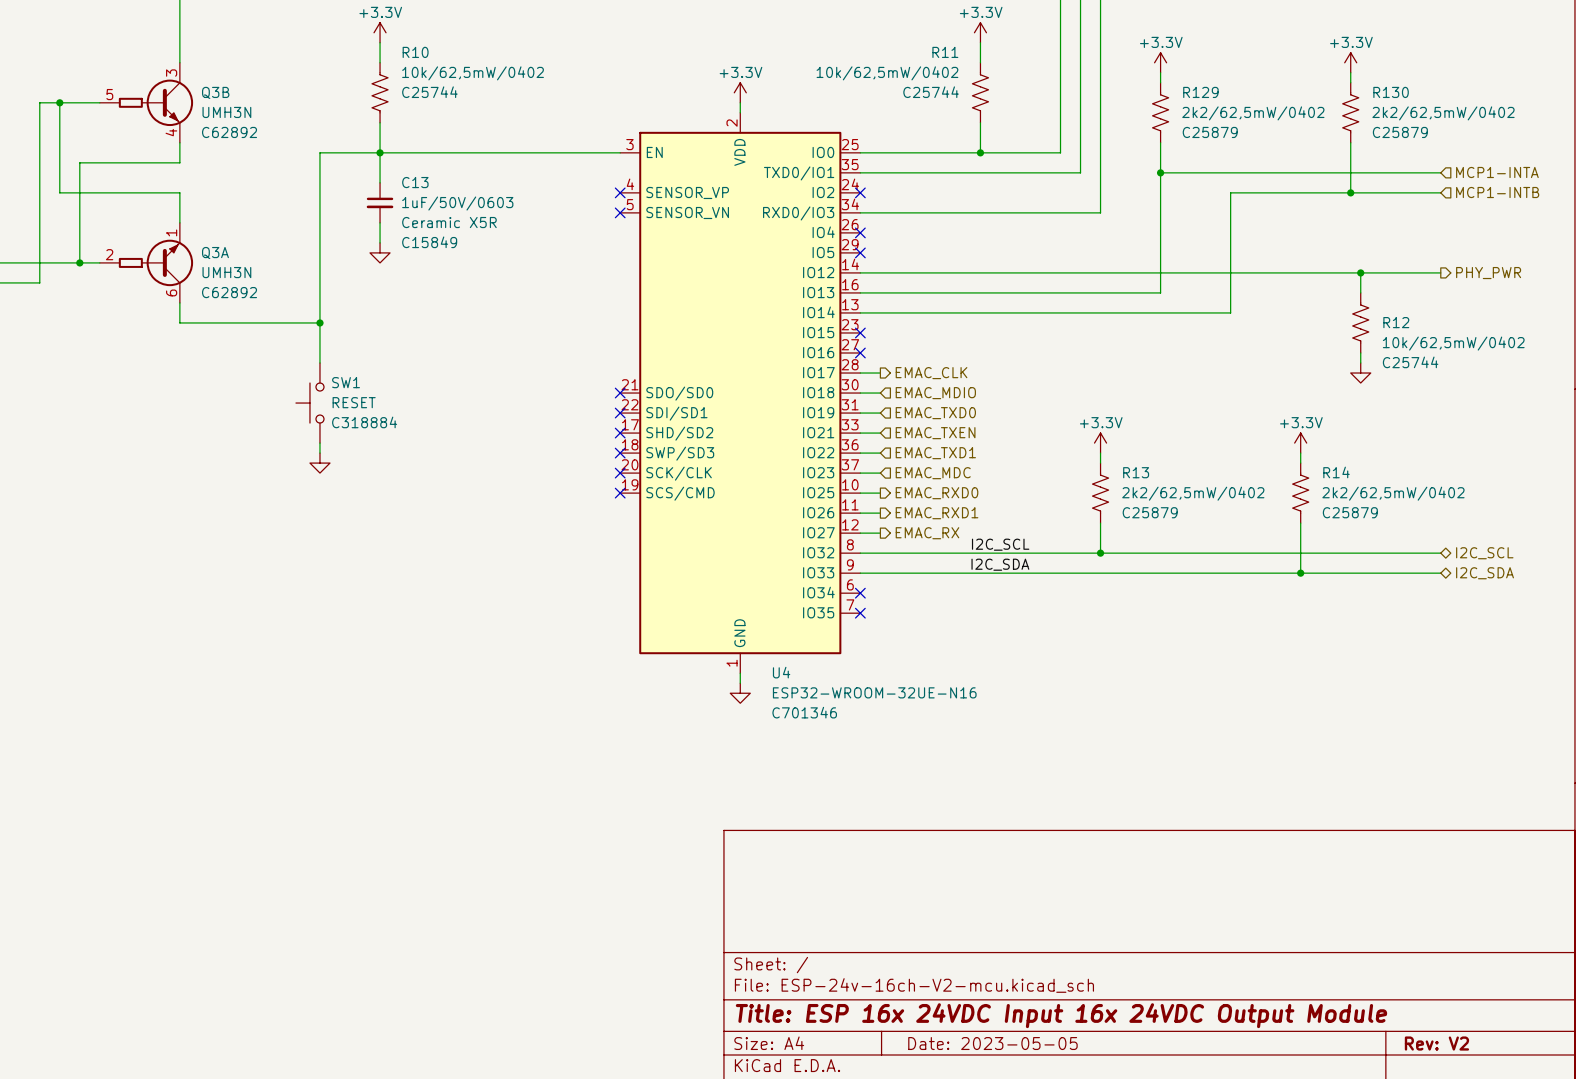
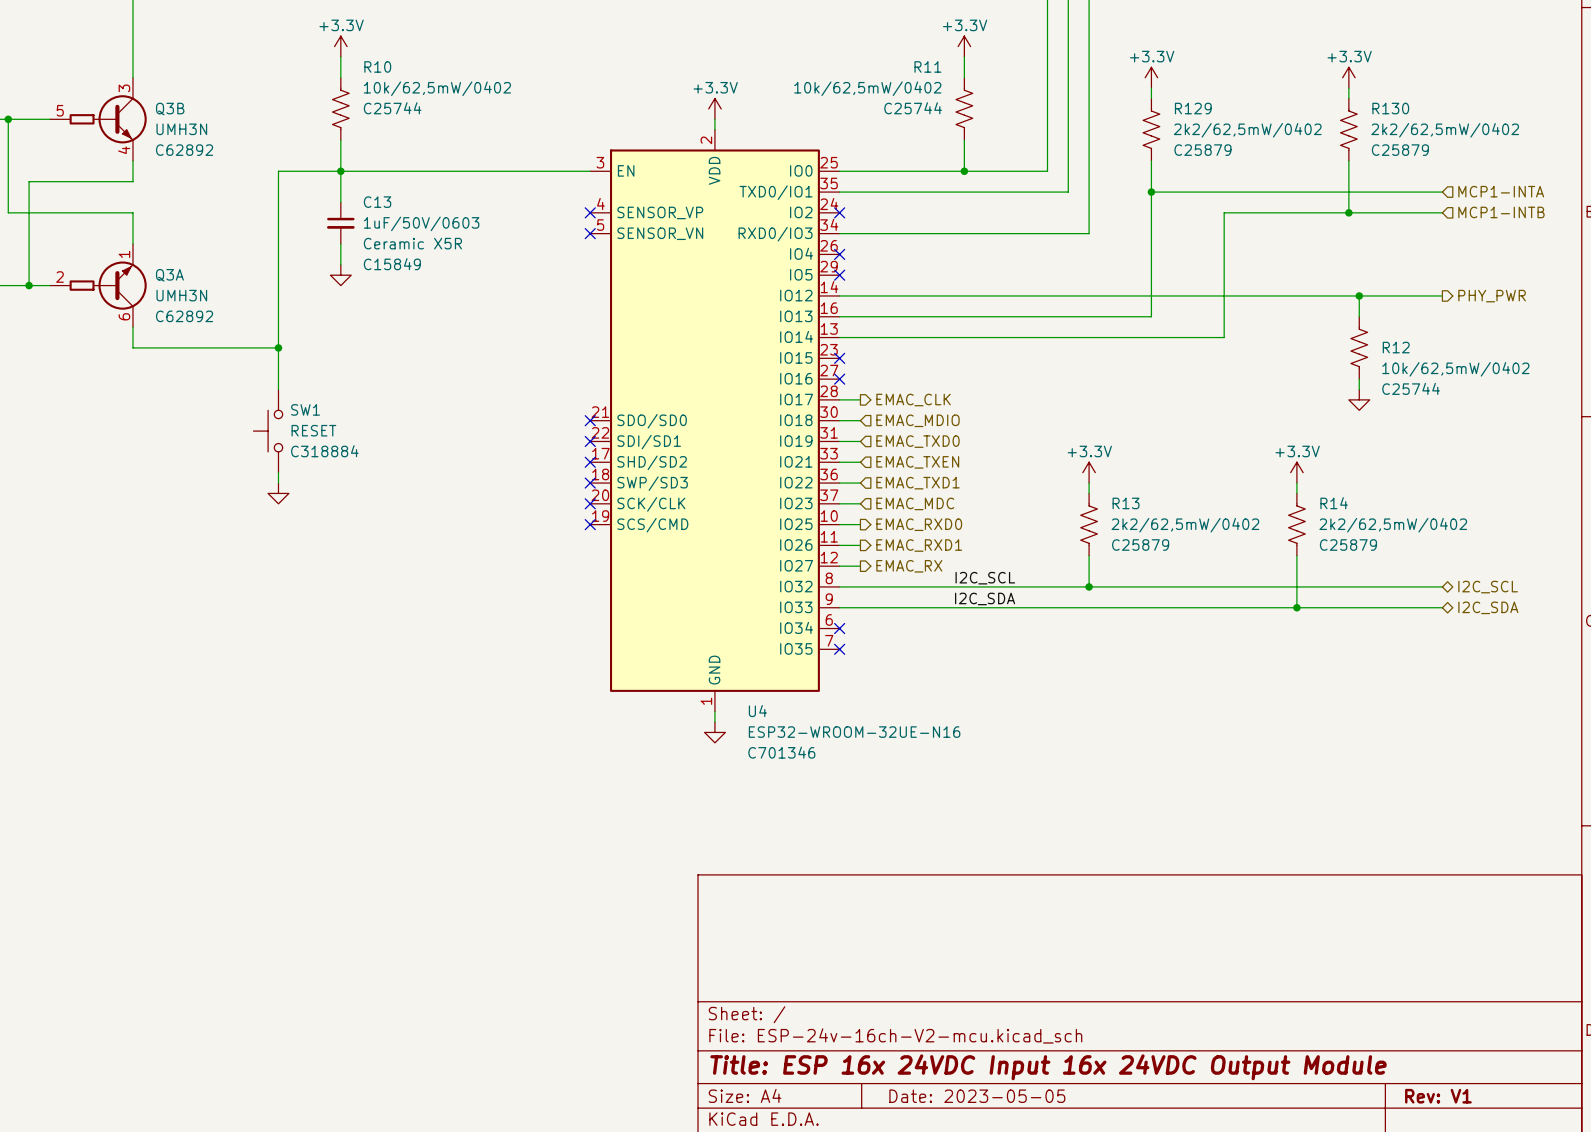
title block: Rev: V2 (1436, 1043) -> Rev: V1 (1438, 1096)

